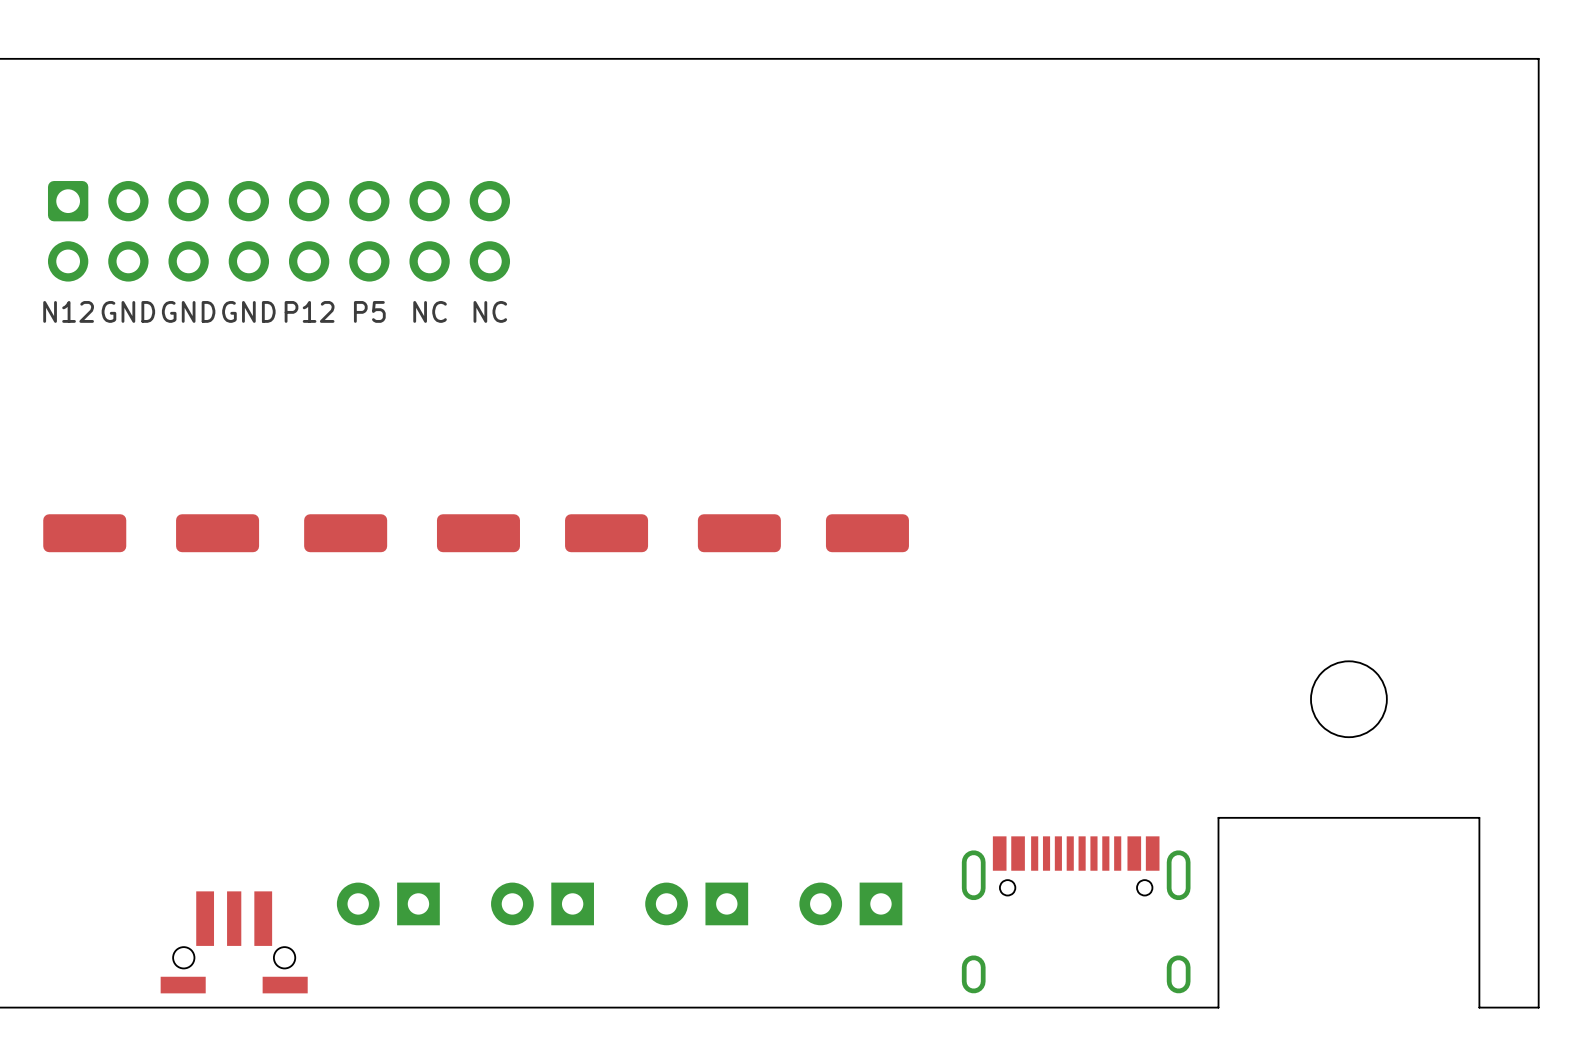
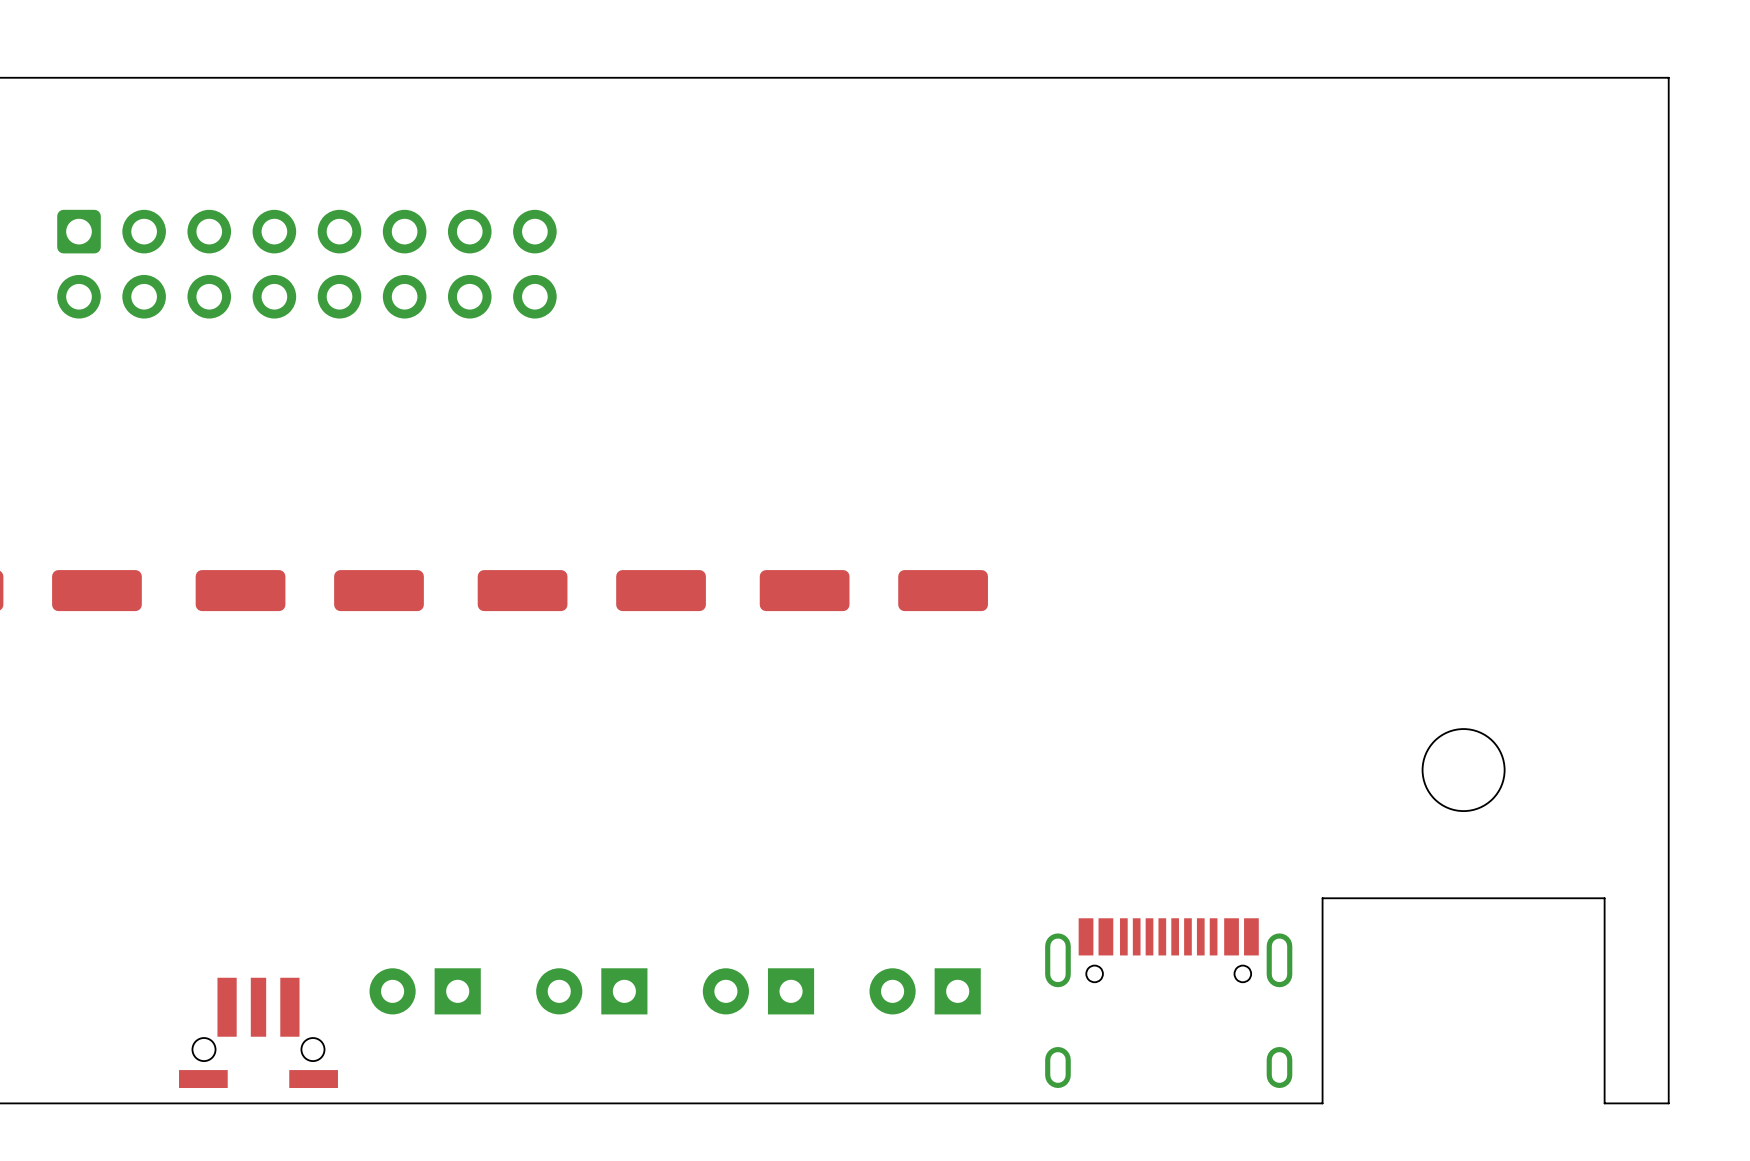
text: N12 (68, 311) -> none
text: GND (128, 311) -> none
text: GND (188, 311) -> none
text: GND (248, 311) -> none
text: P12 (309, 311) -> none
text: P5 (369, 311) -> none
text: NC (430, 311) -> none
text: NC (490, 311) -> none

